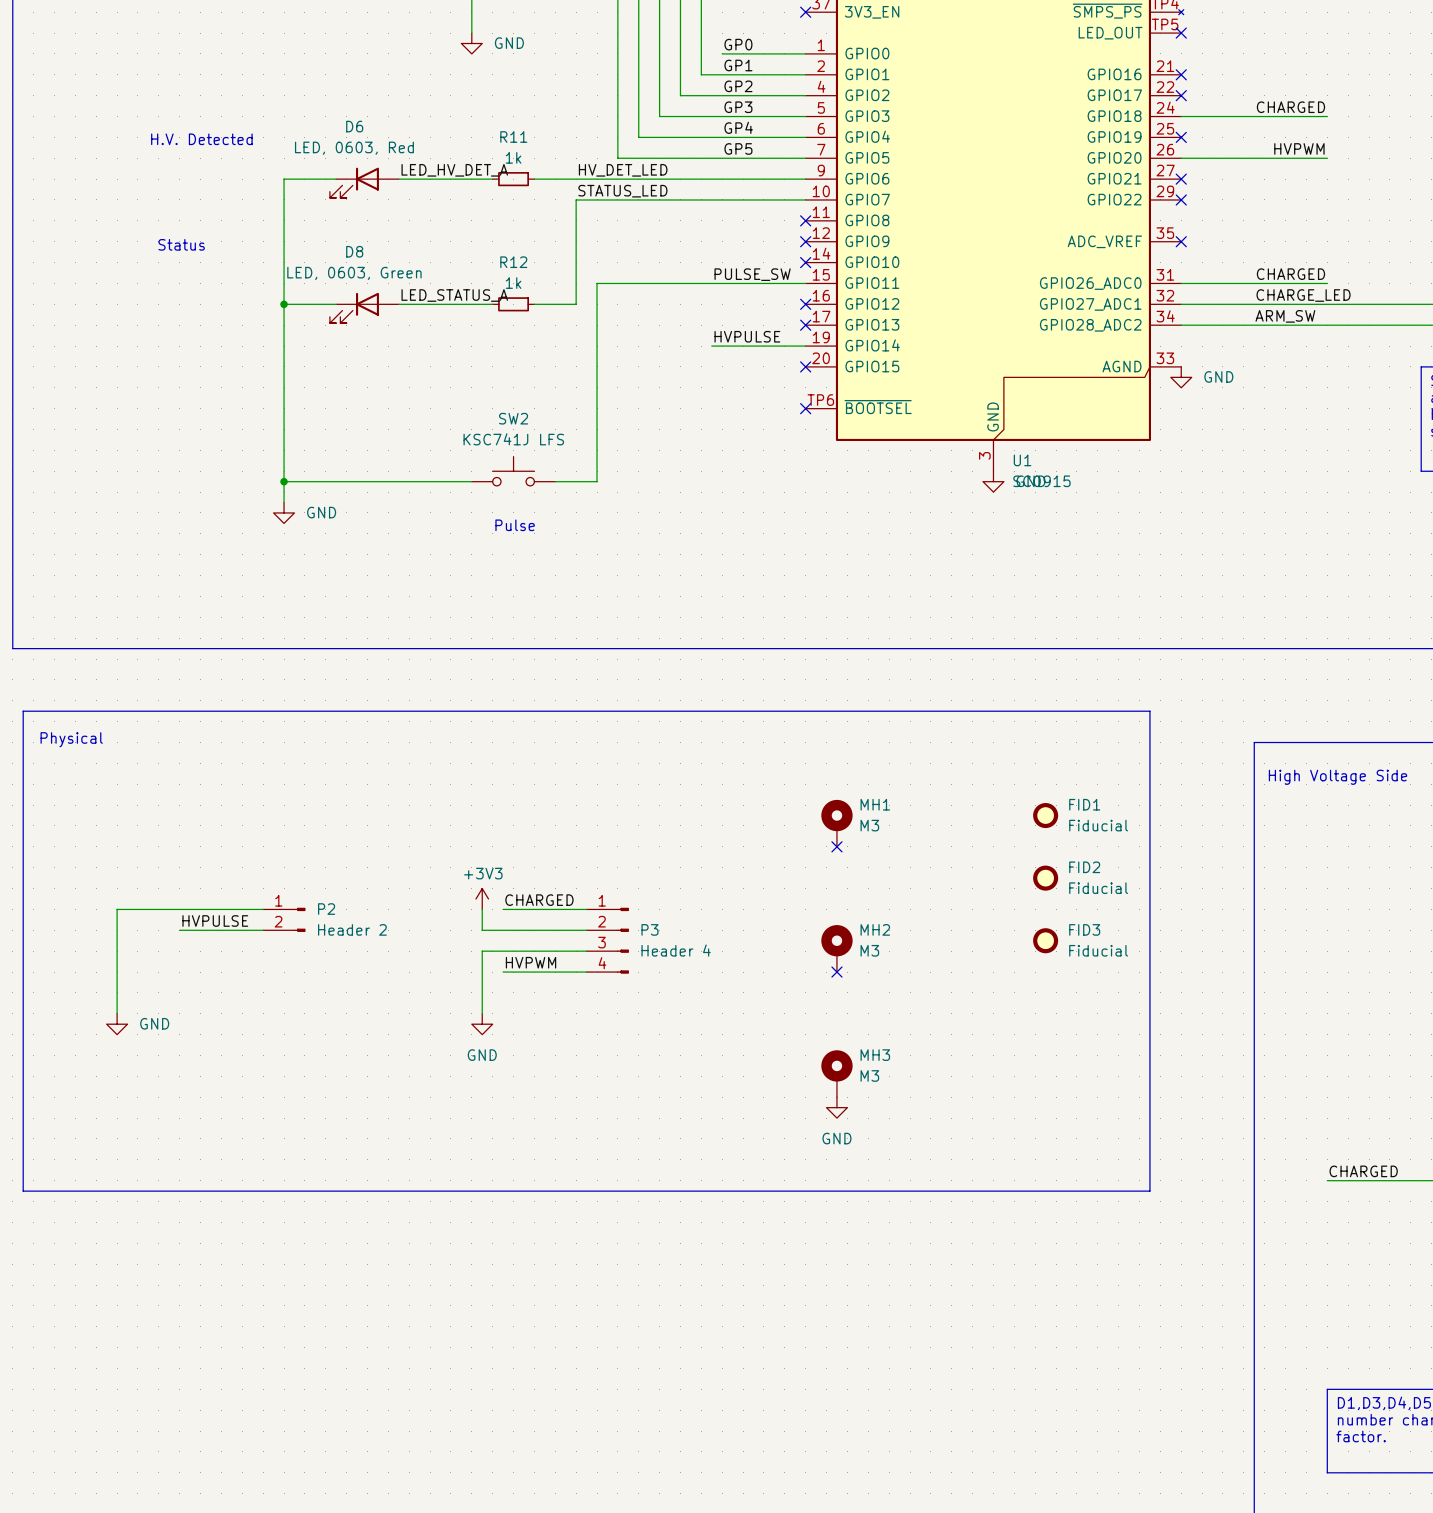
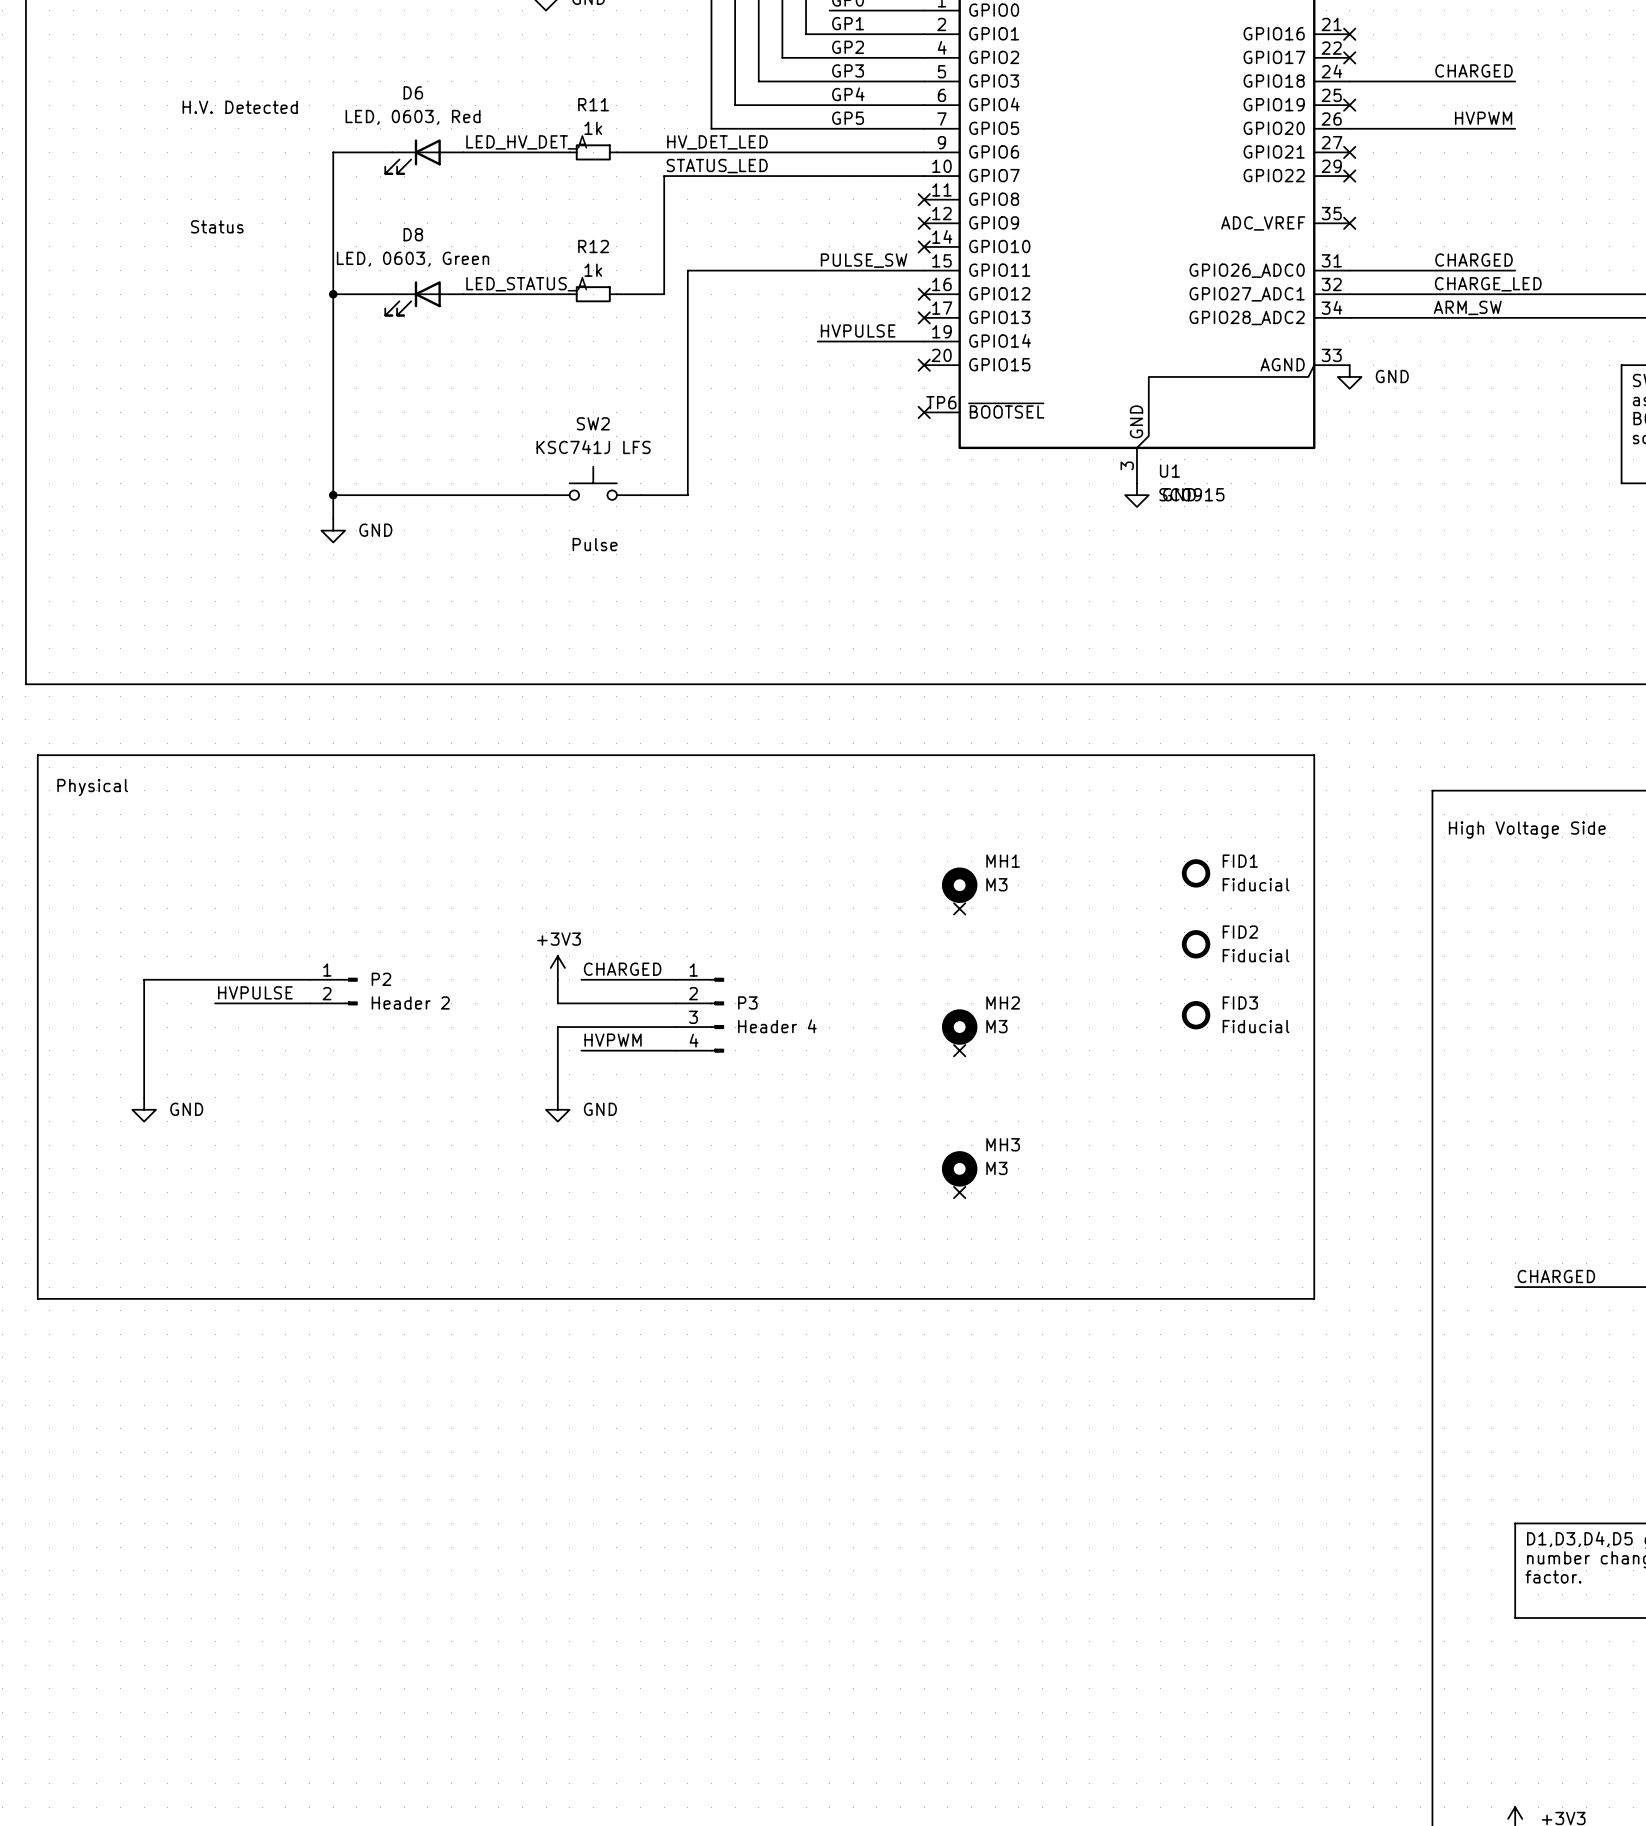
MH1 symbol: [821, 799, 853, 847] -> [941, 867, 978, 903]
MH2 symbol: [821, 925, 853, 973] -> [941, 1009, 978, 1045]
MH3 symbol: [821, 1050, 853, 1098] -> [941, 1151, 978, 1187]
power symbol text position: GND (482, 1055) -> GND (600, 1109)
no-connect mark: none -> (959, 1192)
power symbol: GND (836, 1107) -> none

